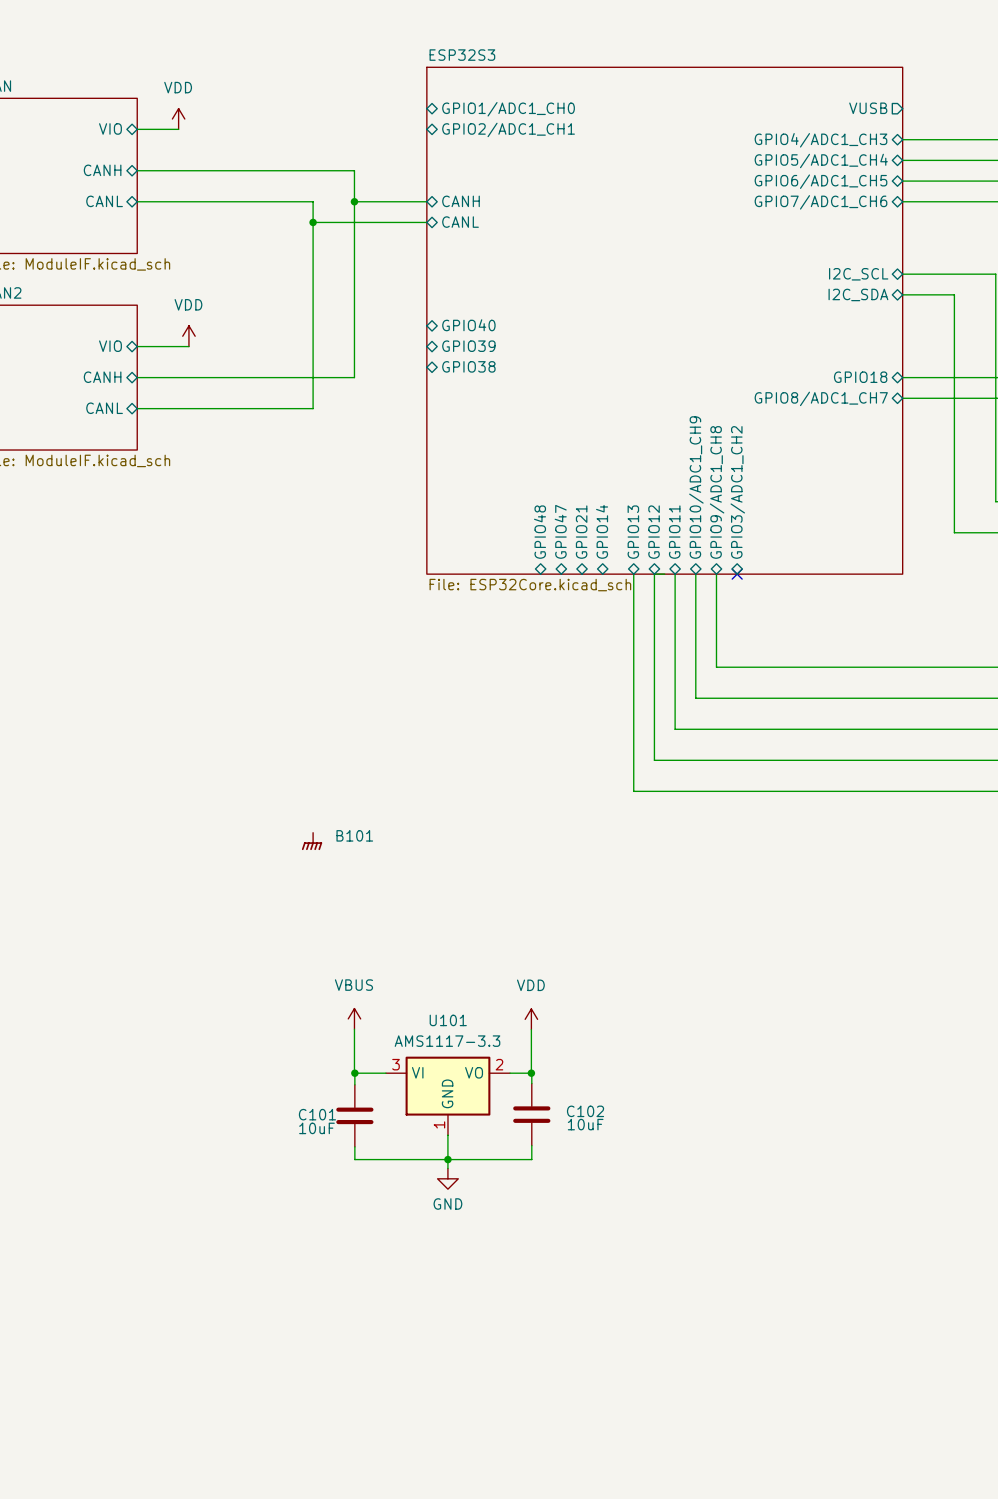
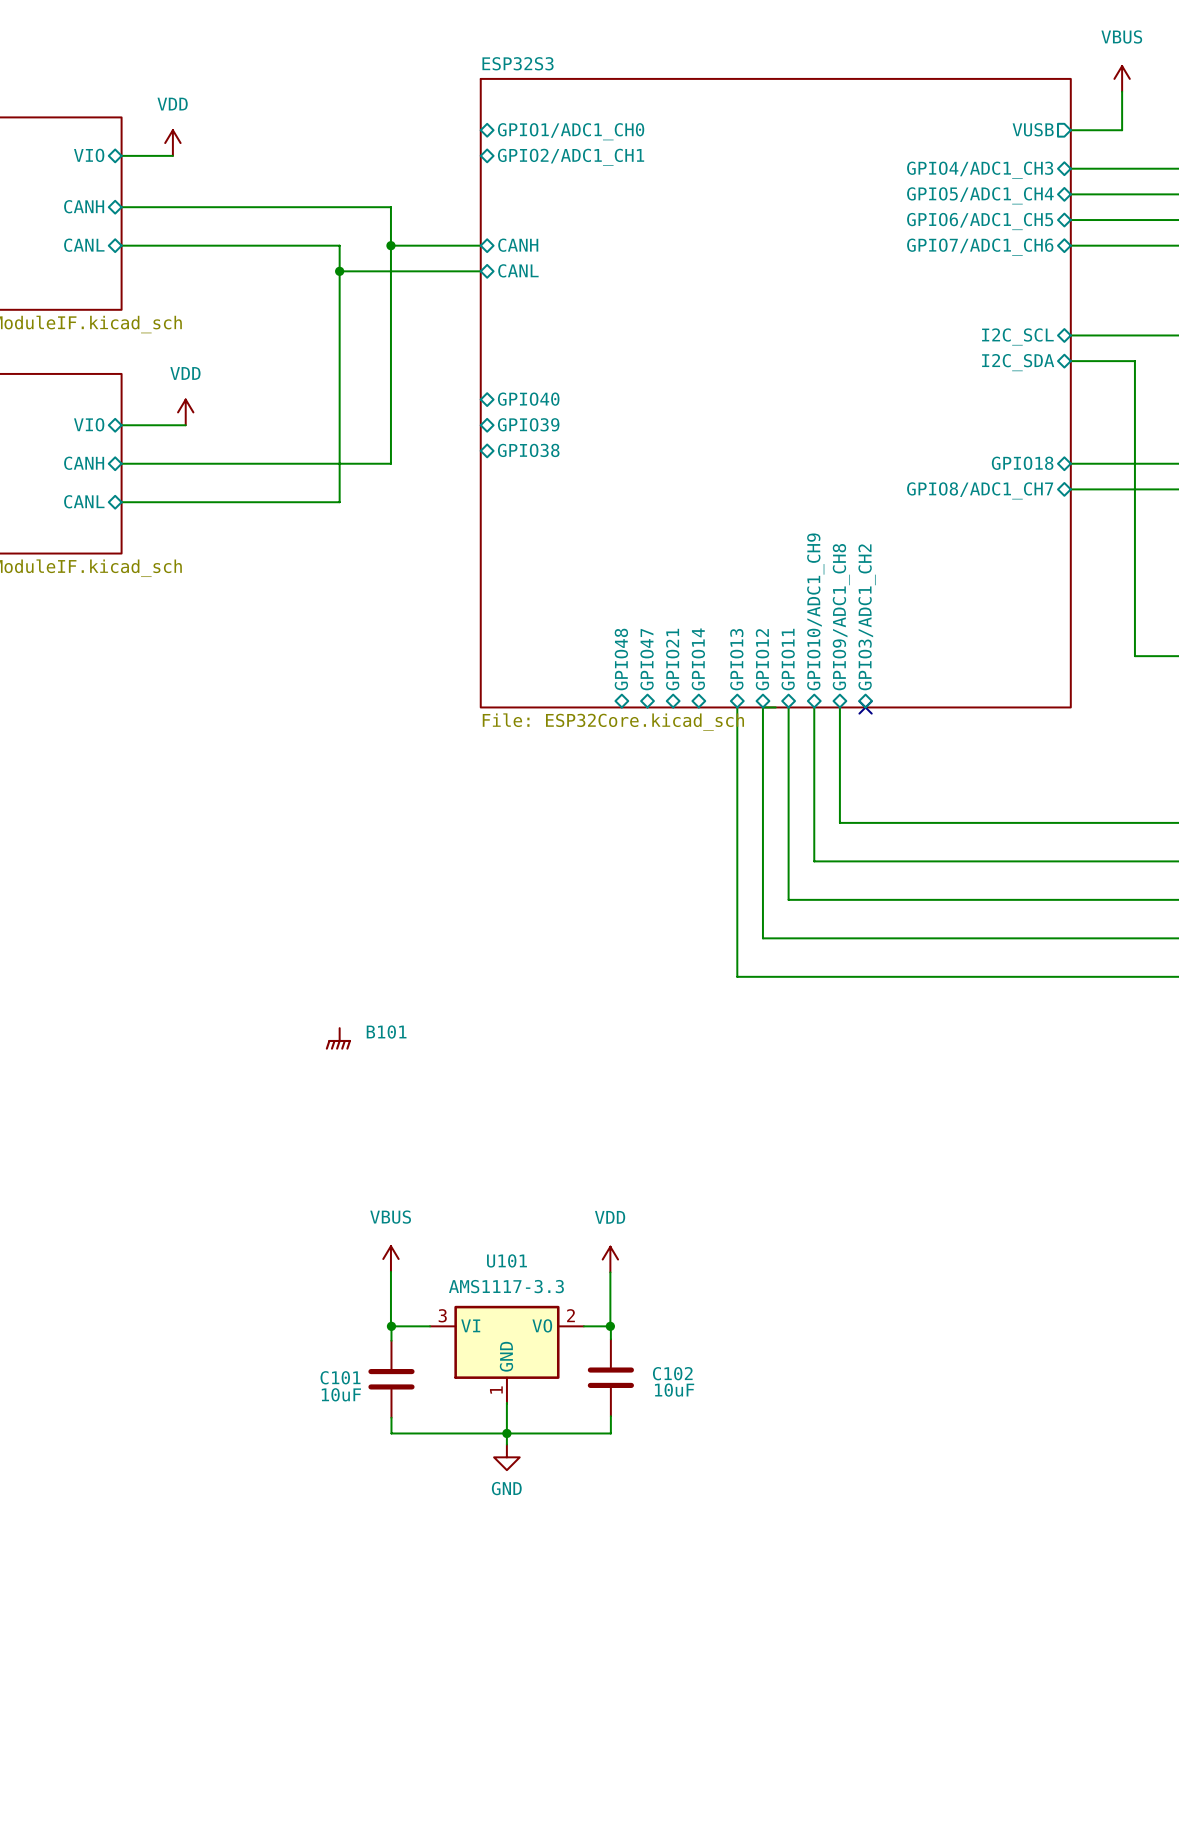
power symbol: none -> VBUS (1122, 78)
wire: none -> (1122, 91) (1122, 130) (1070, 130)

